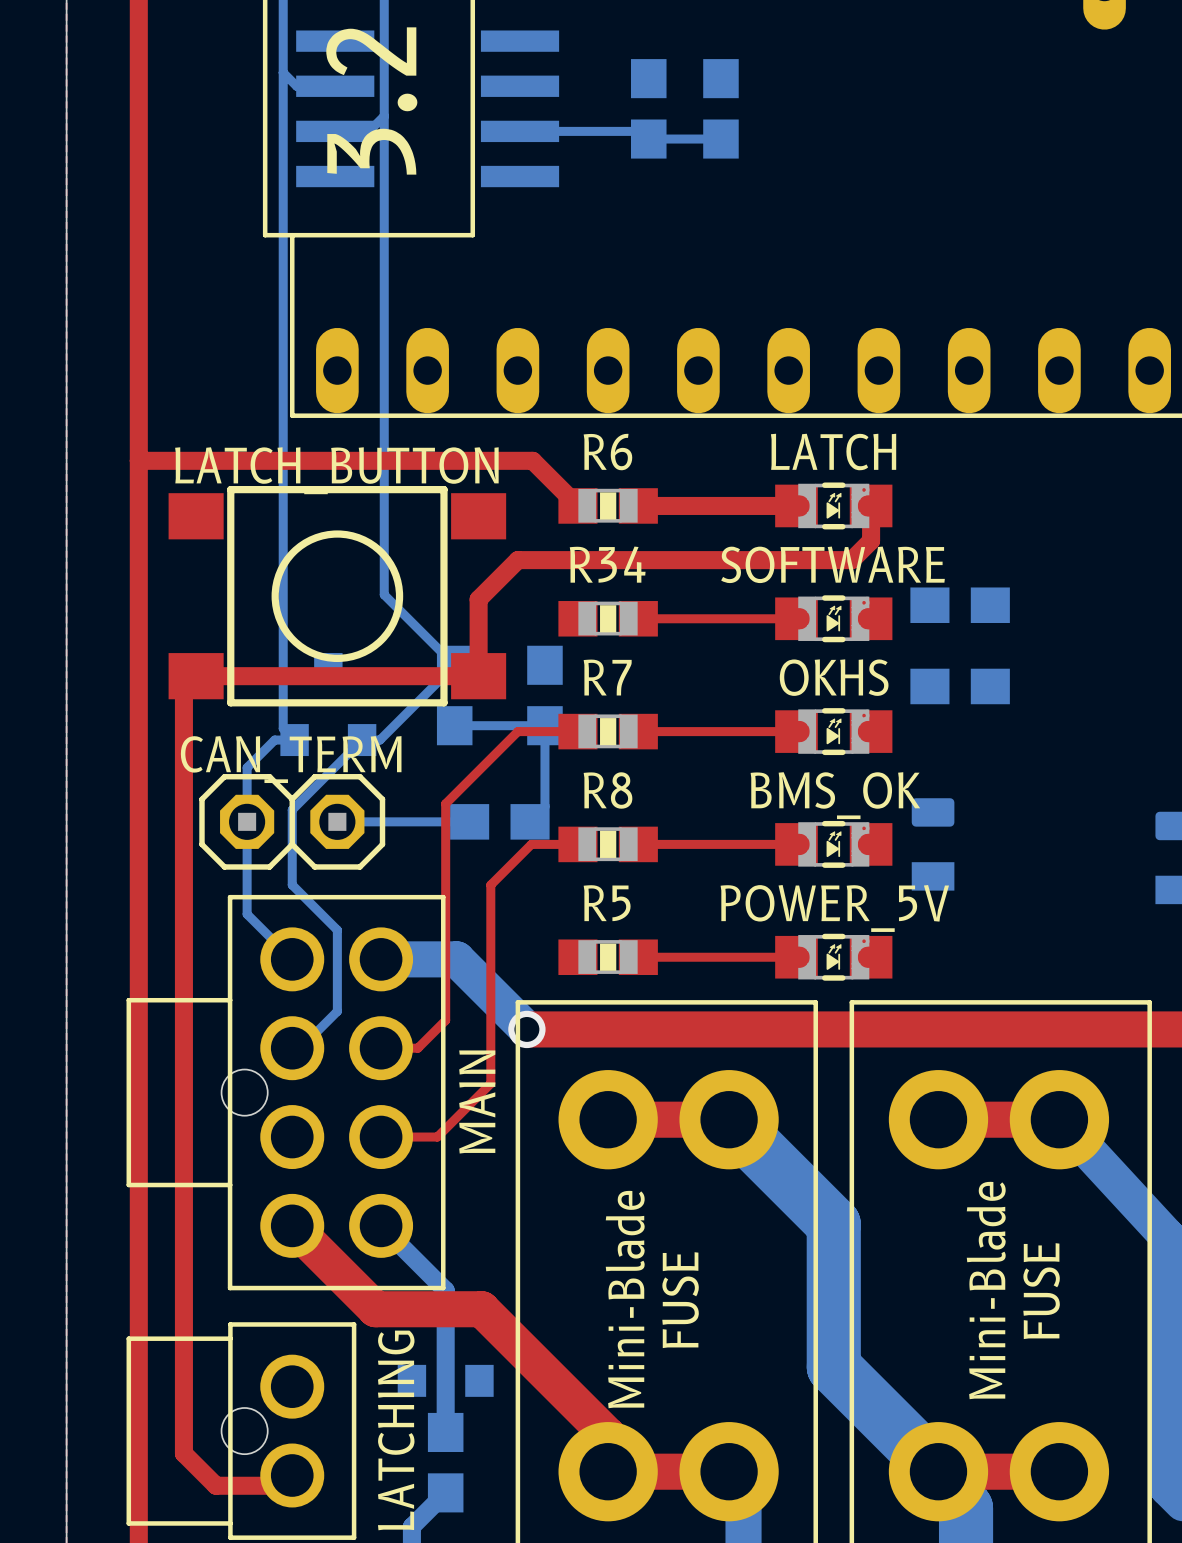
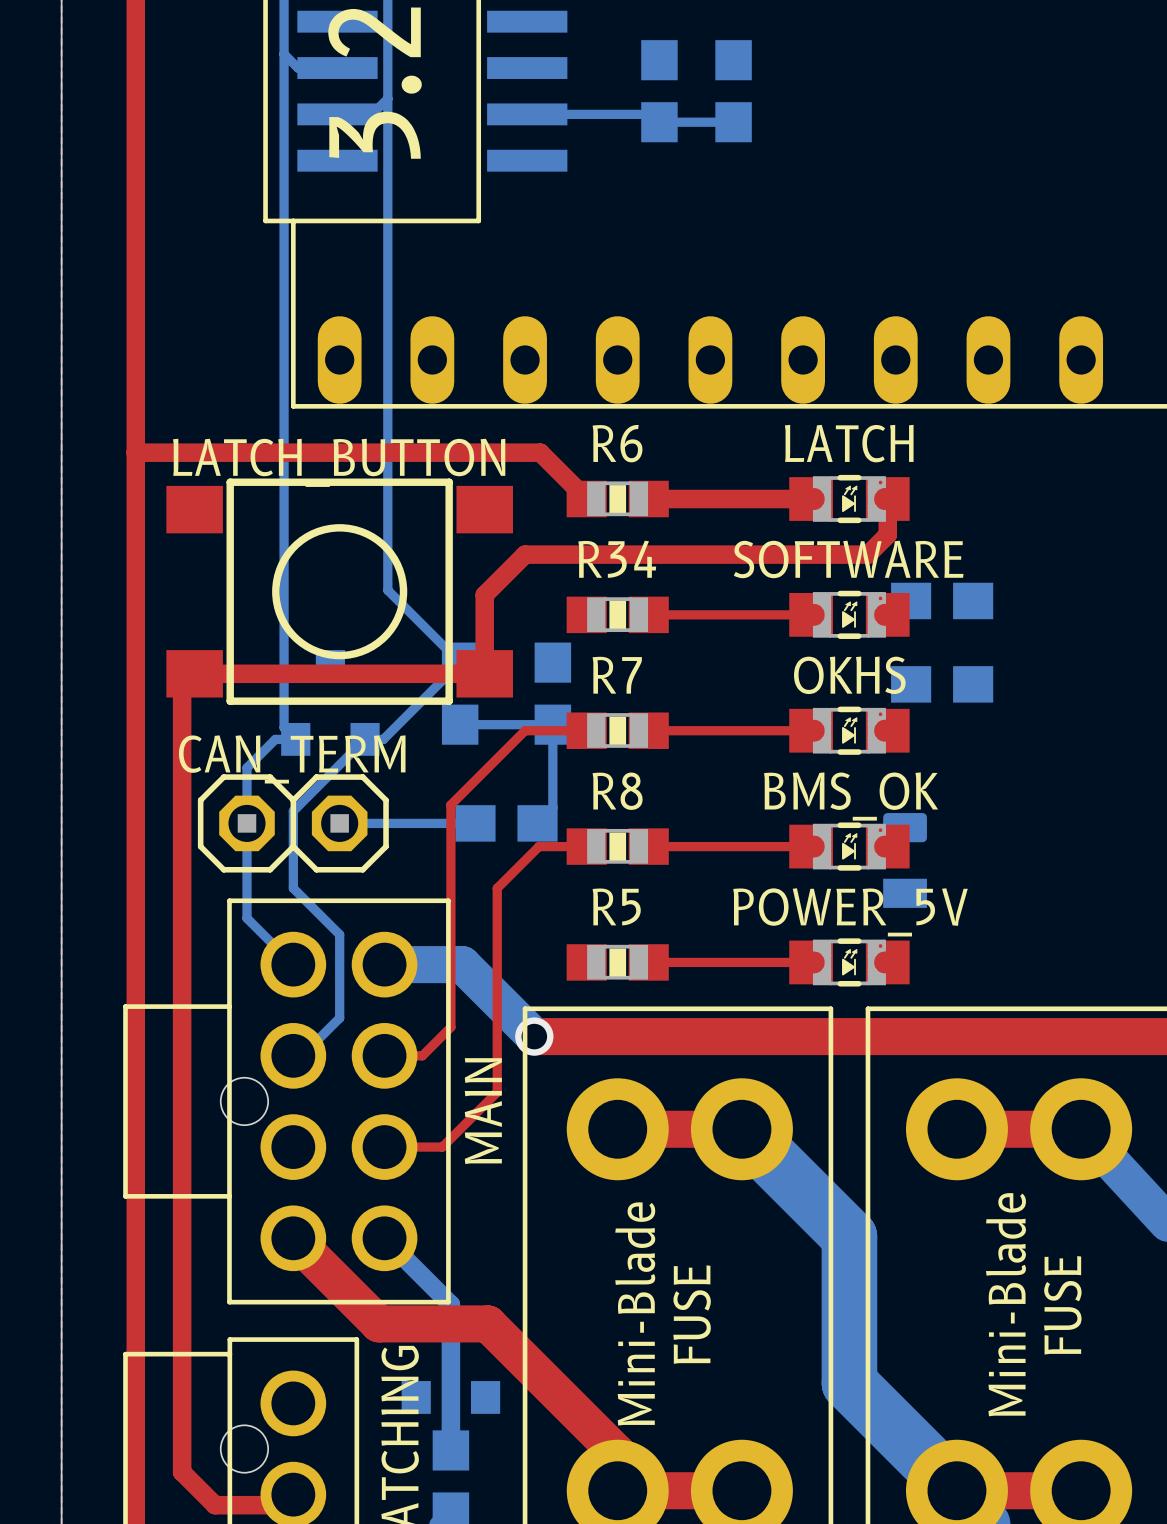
part position: (960, 605) -> (942, 600)
part position: (960, 686) -> (942, 684)
part position: (933, 844) -> (905, 860)

